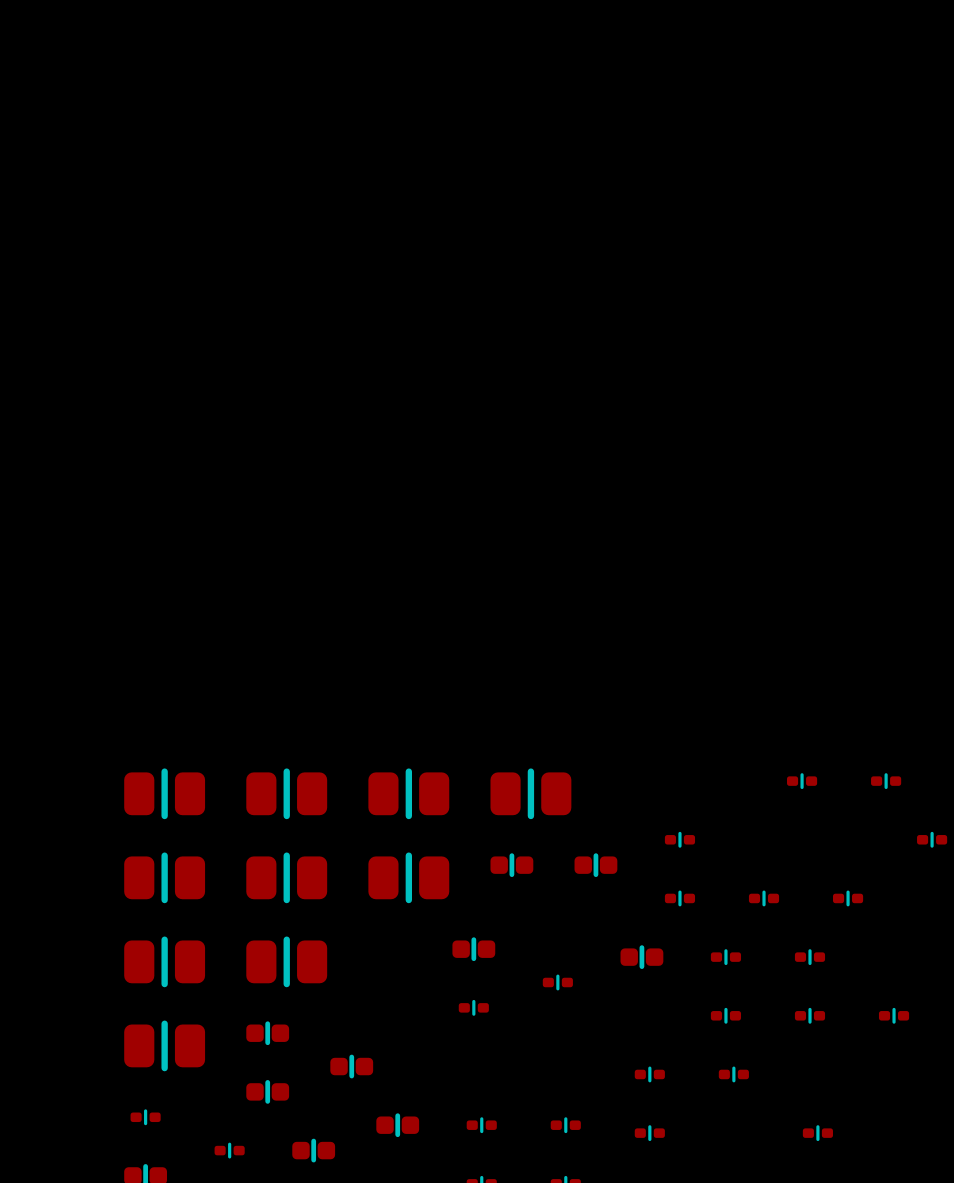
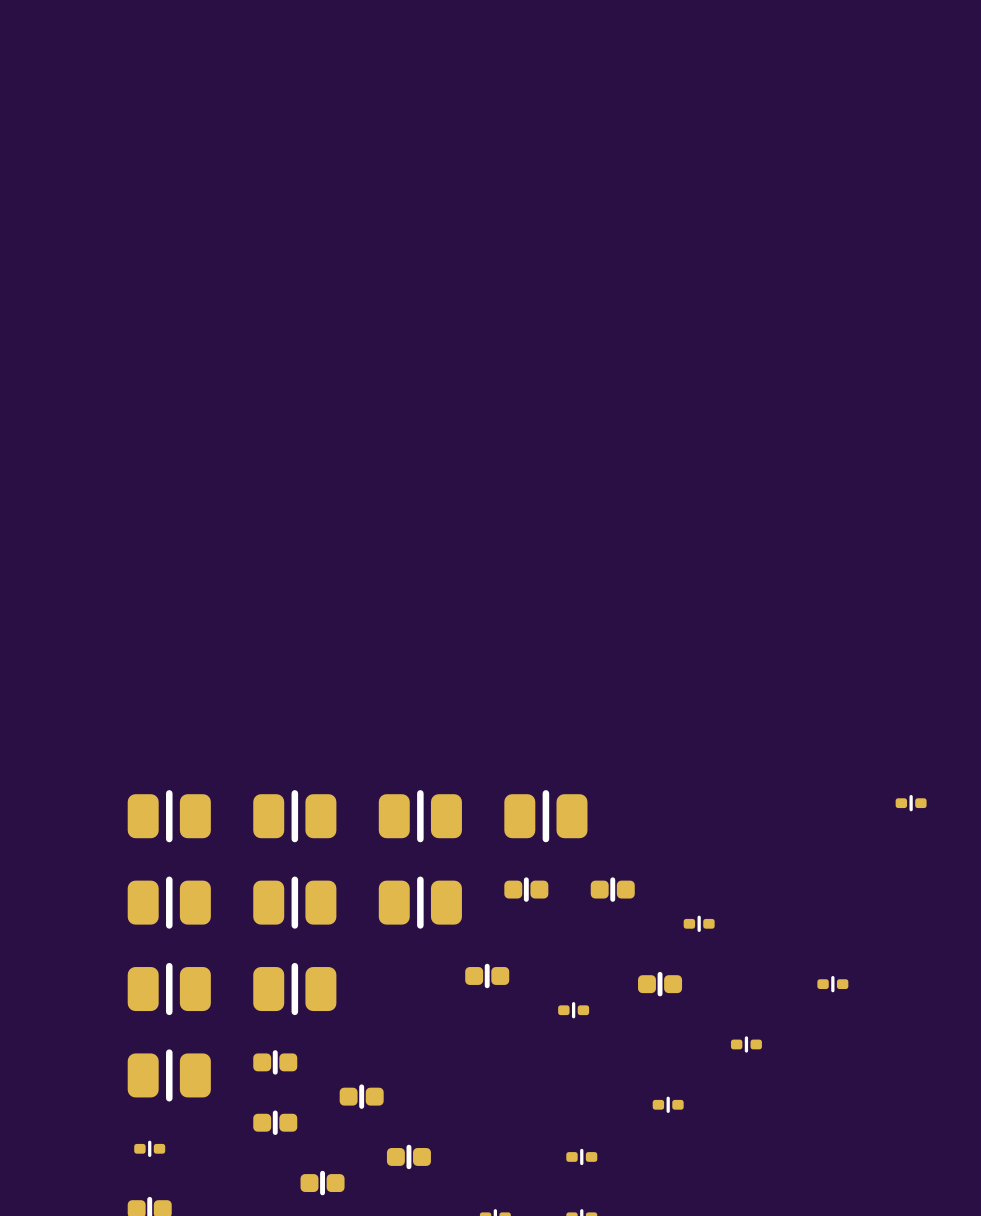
part: (802, 781) -> none
part: (679, 839) -> none
part: (932, 839) -> none
part: (764, 898) -> none
part: (848, 898) -> none
part: (725, 957) -> none
part: (473, 1007) -> none
part: (809, 1015) -> none
part: (894, 1015) -> none
part: (733, 1074) -> none
part: (481, 1125) -> none
part: (649, 1133) -> none
part: (817, 1133) -> none
part: (229, 1150) -> none

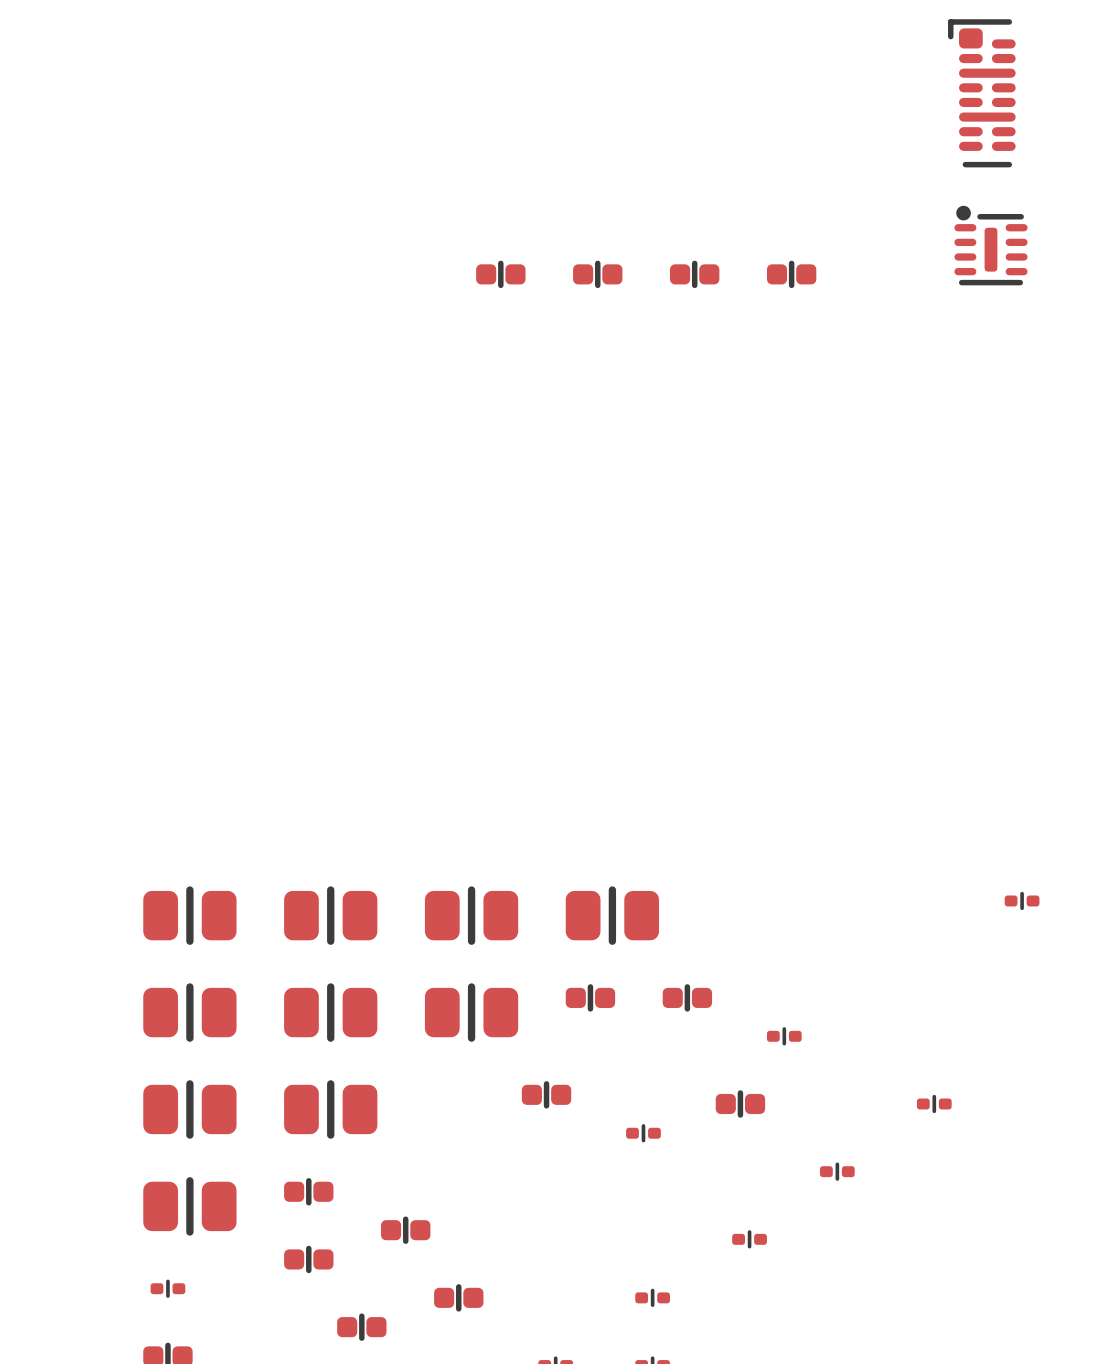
part: none -> (981, 93)
part: none -> (990, 245)
part: none -> (500, 274)
part: none -> (597, 274)
part: none -> (694, 274)
part: none -> (791, 274)

